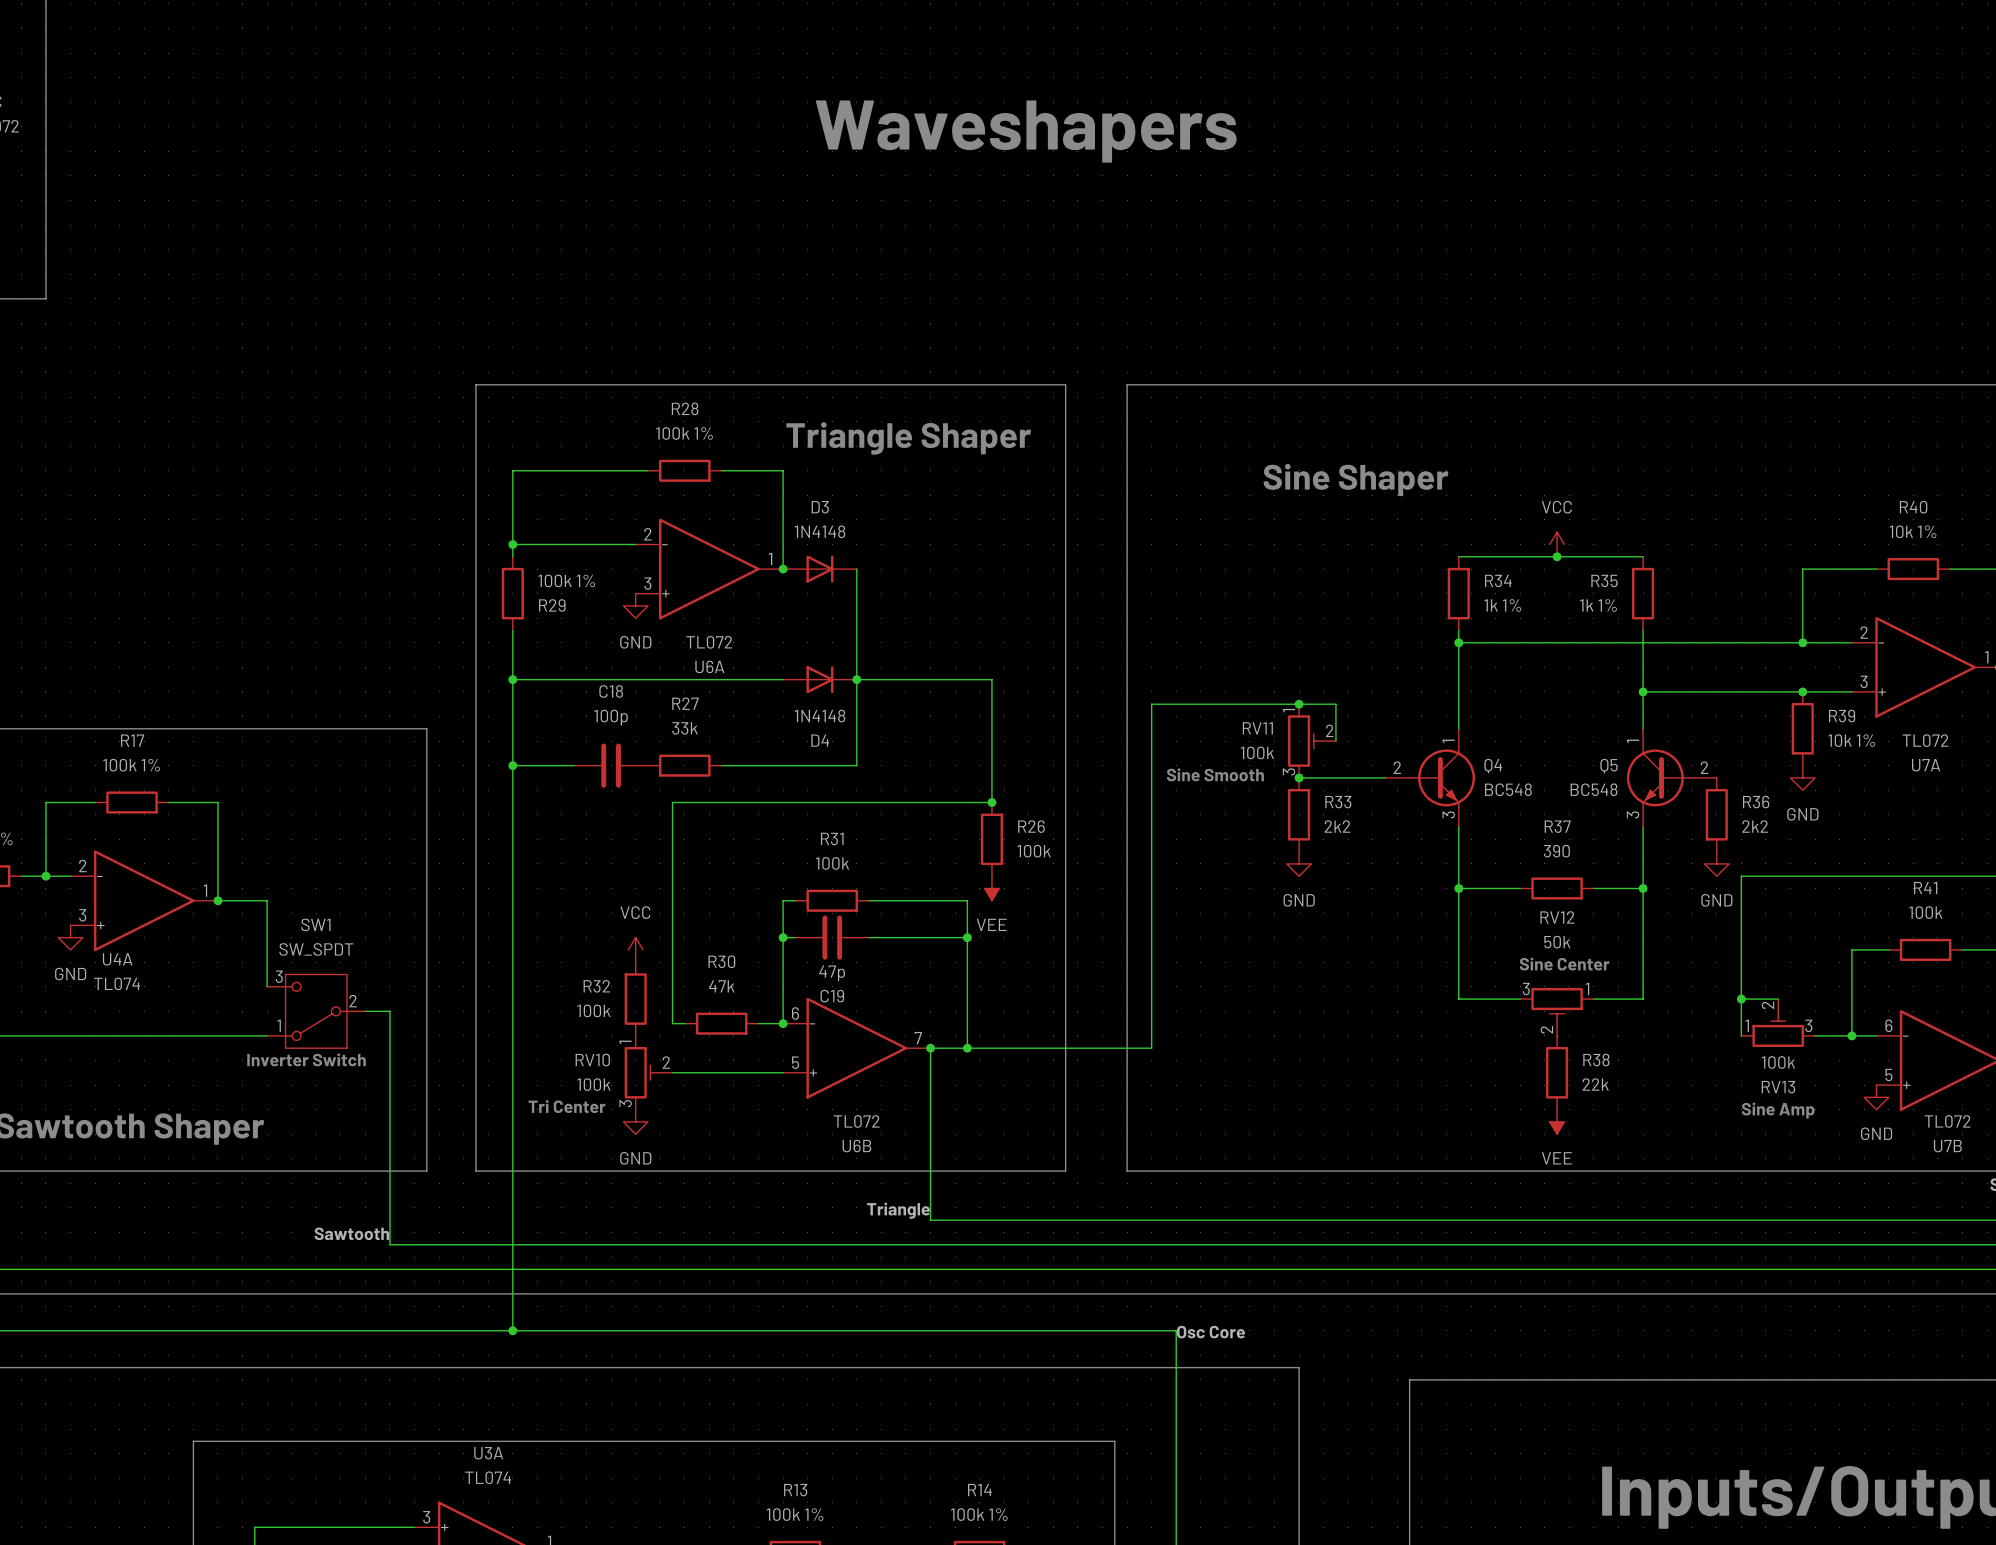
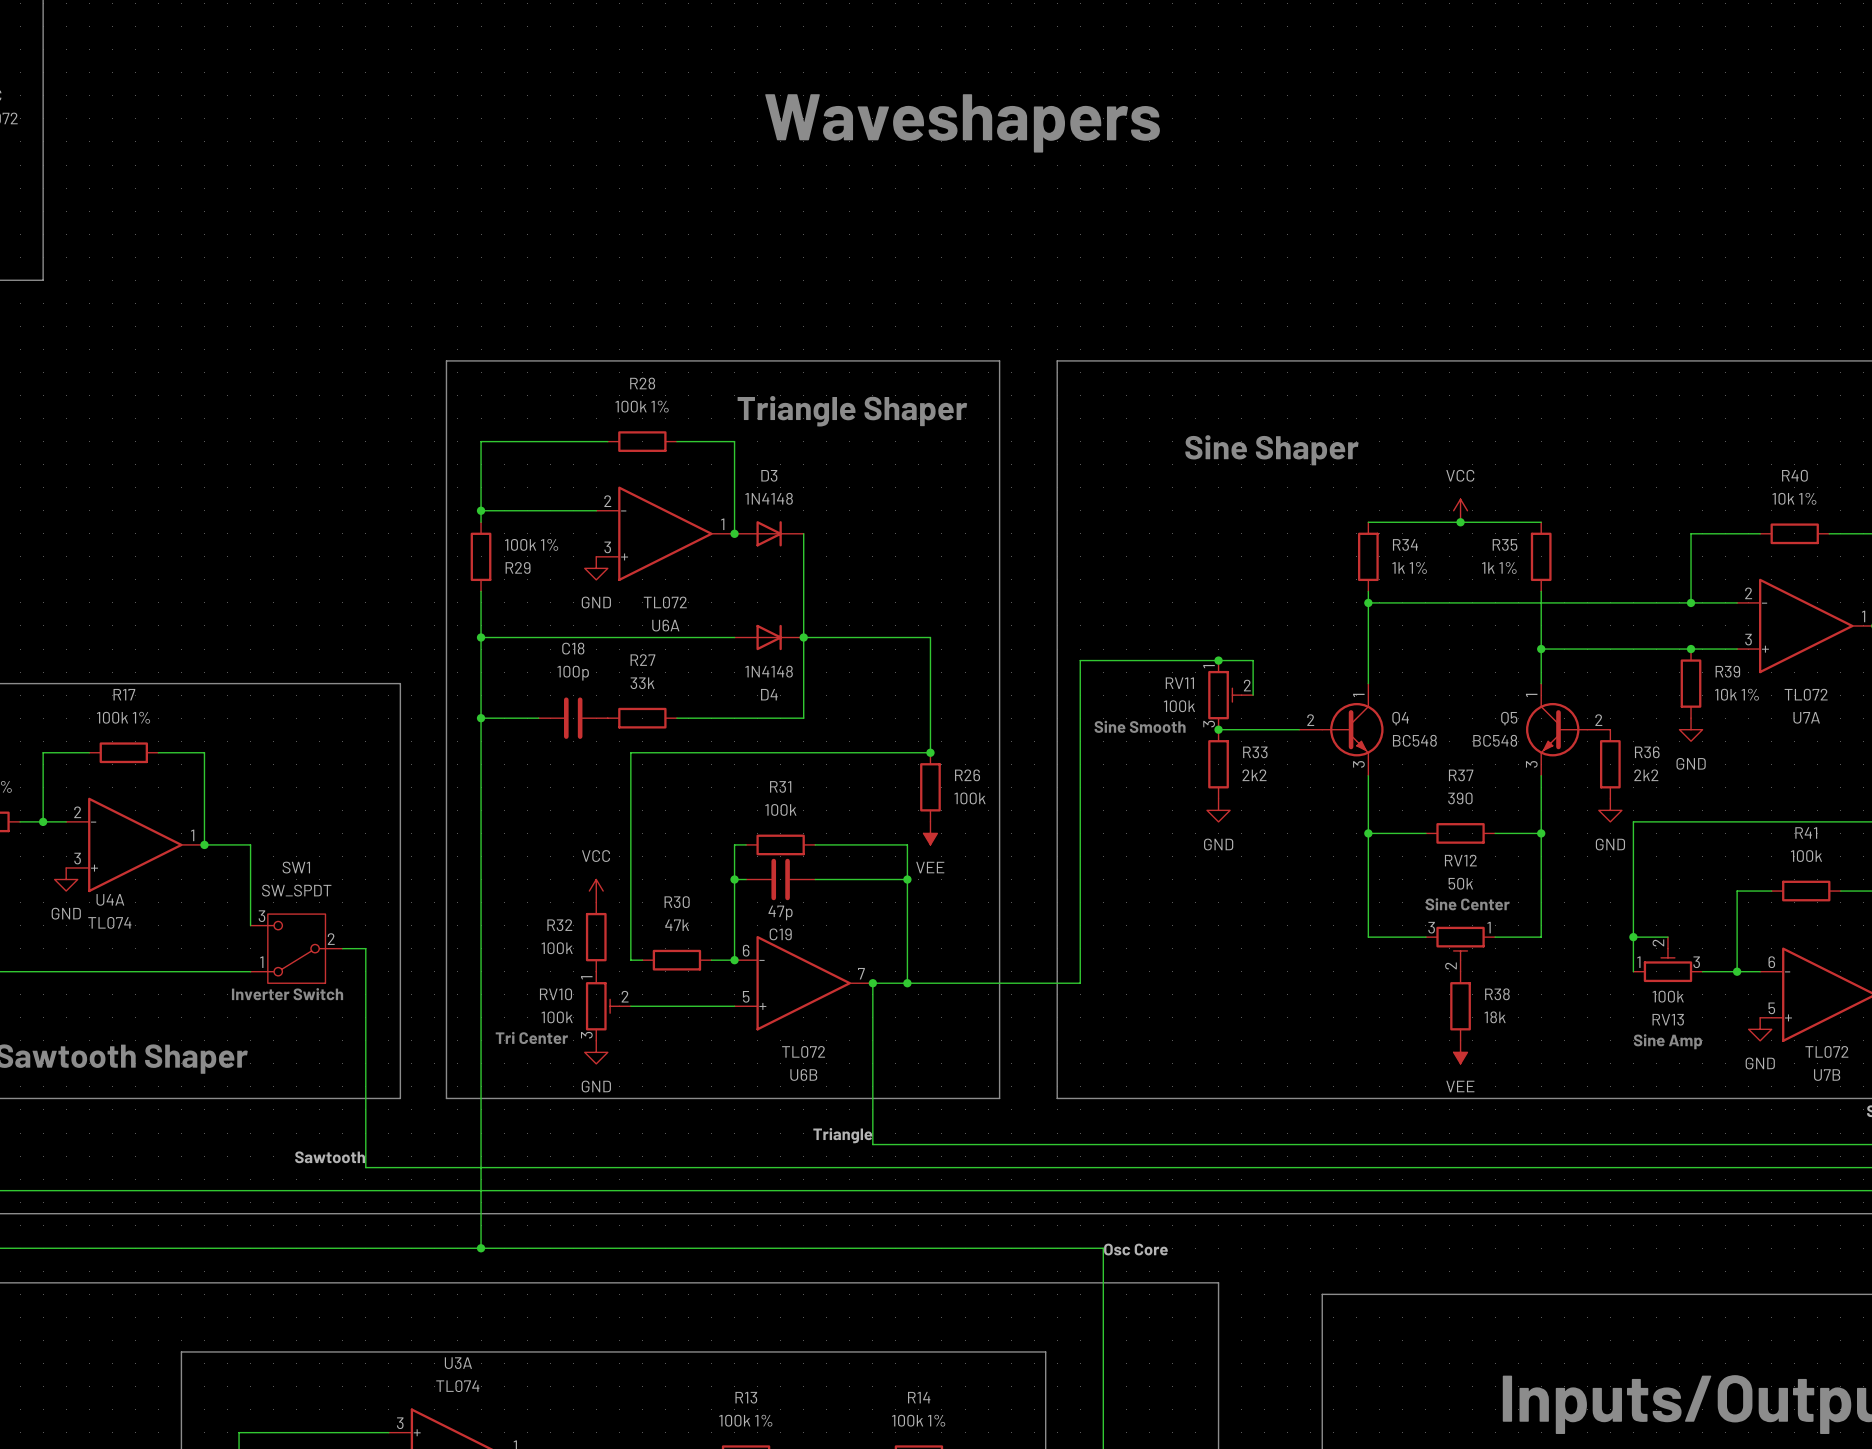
R38 value: 22k (1595, 1084) -> 18k (1495, 1017)

